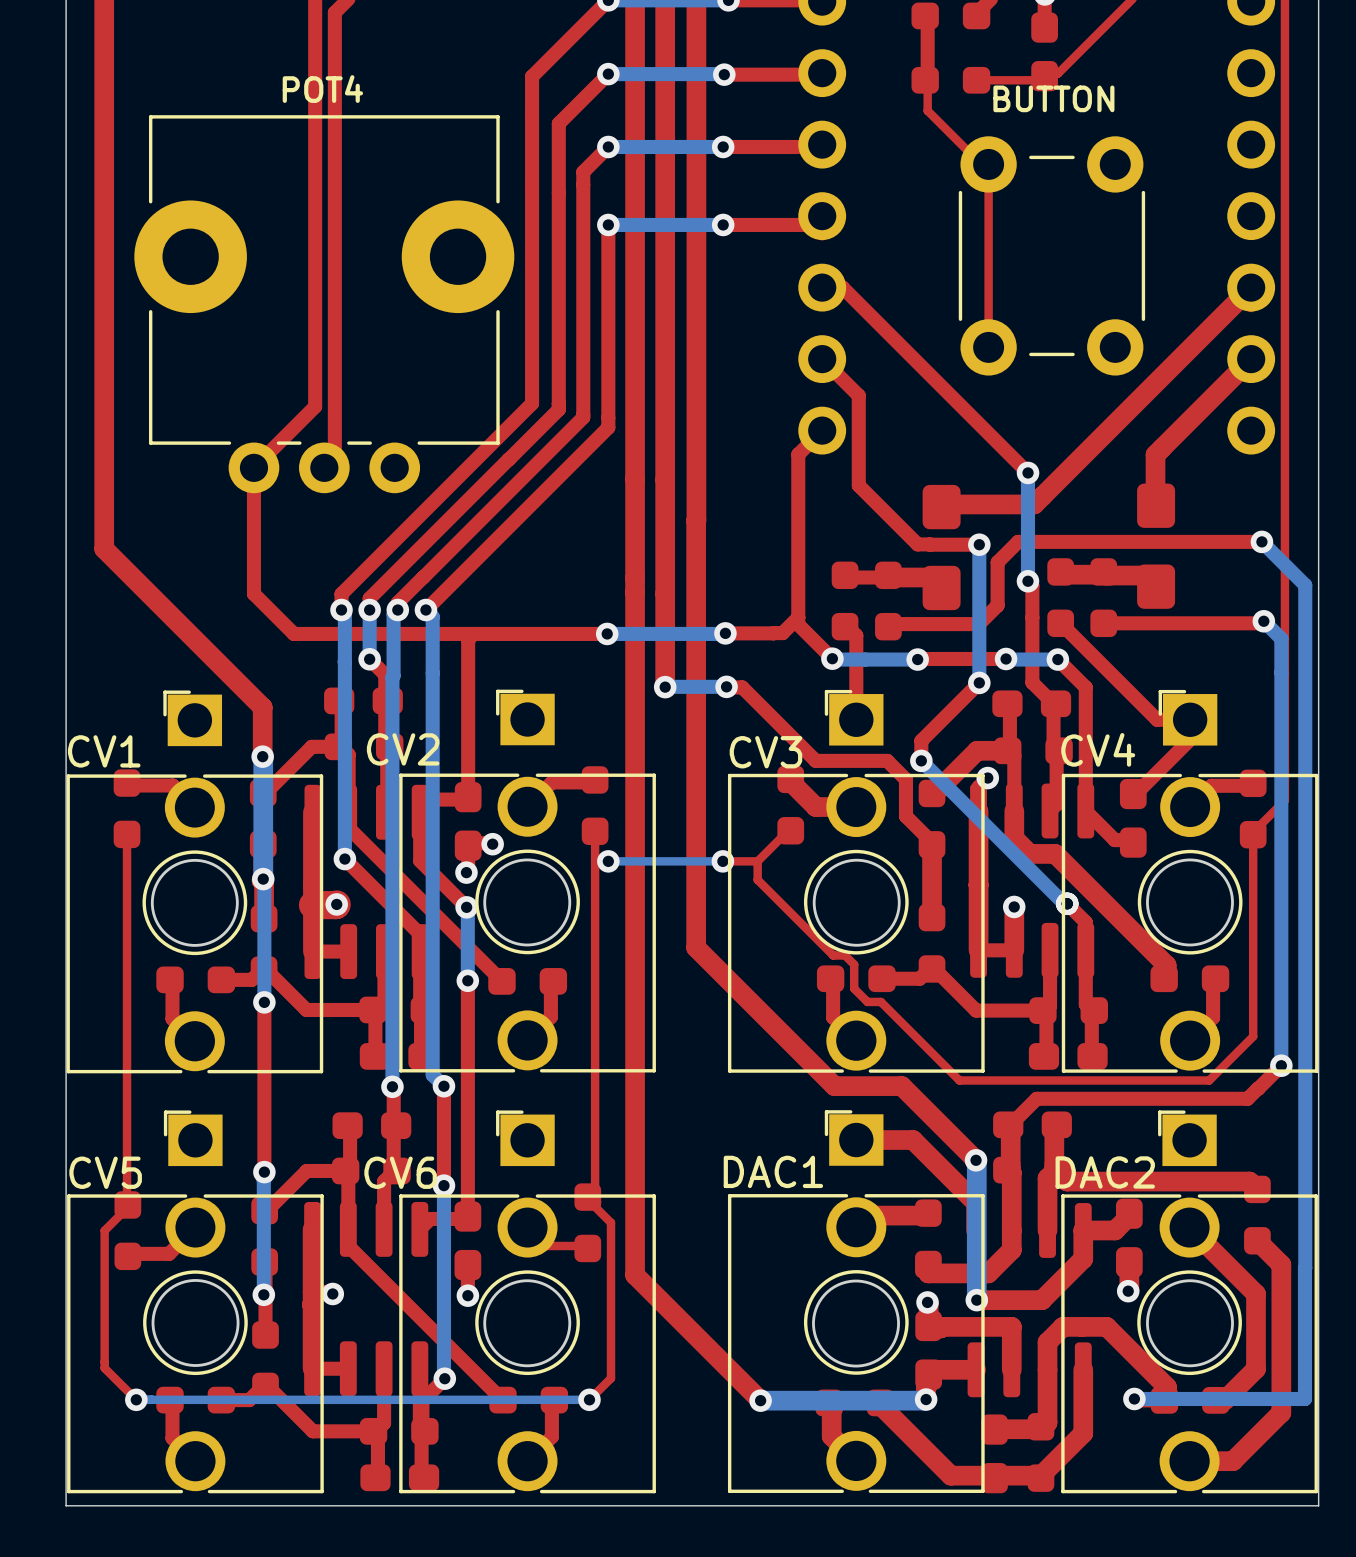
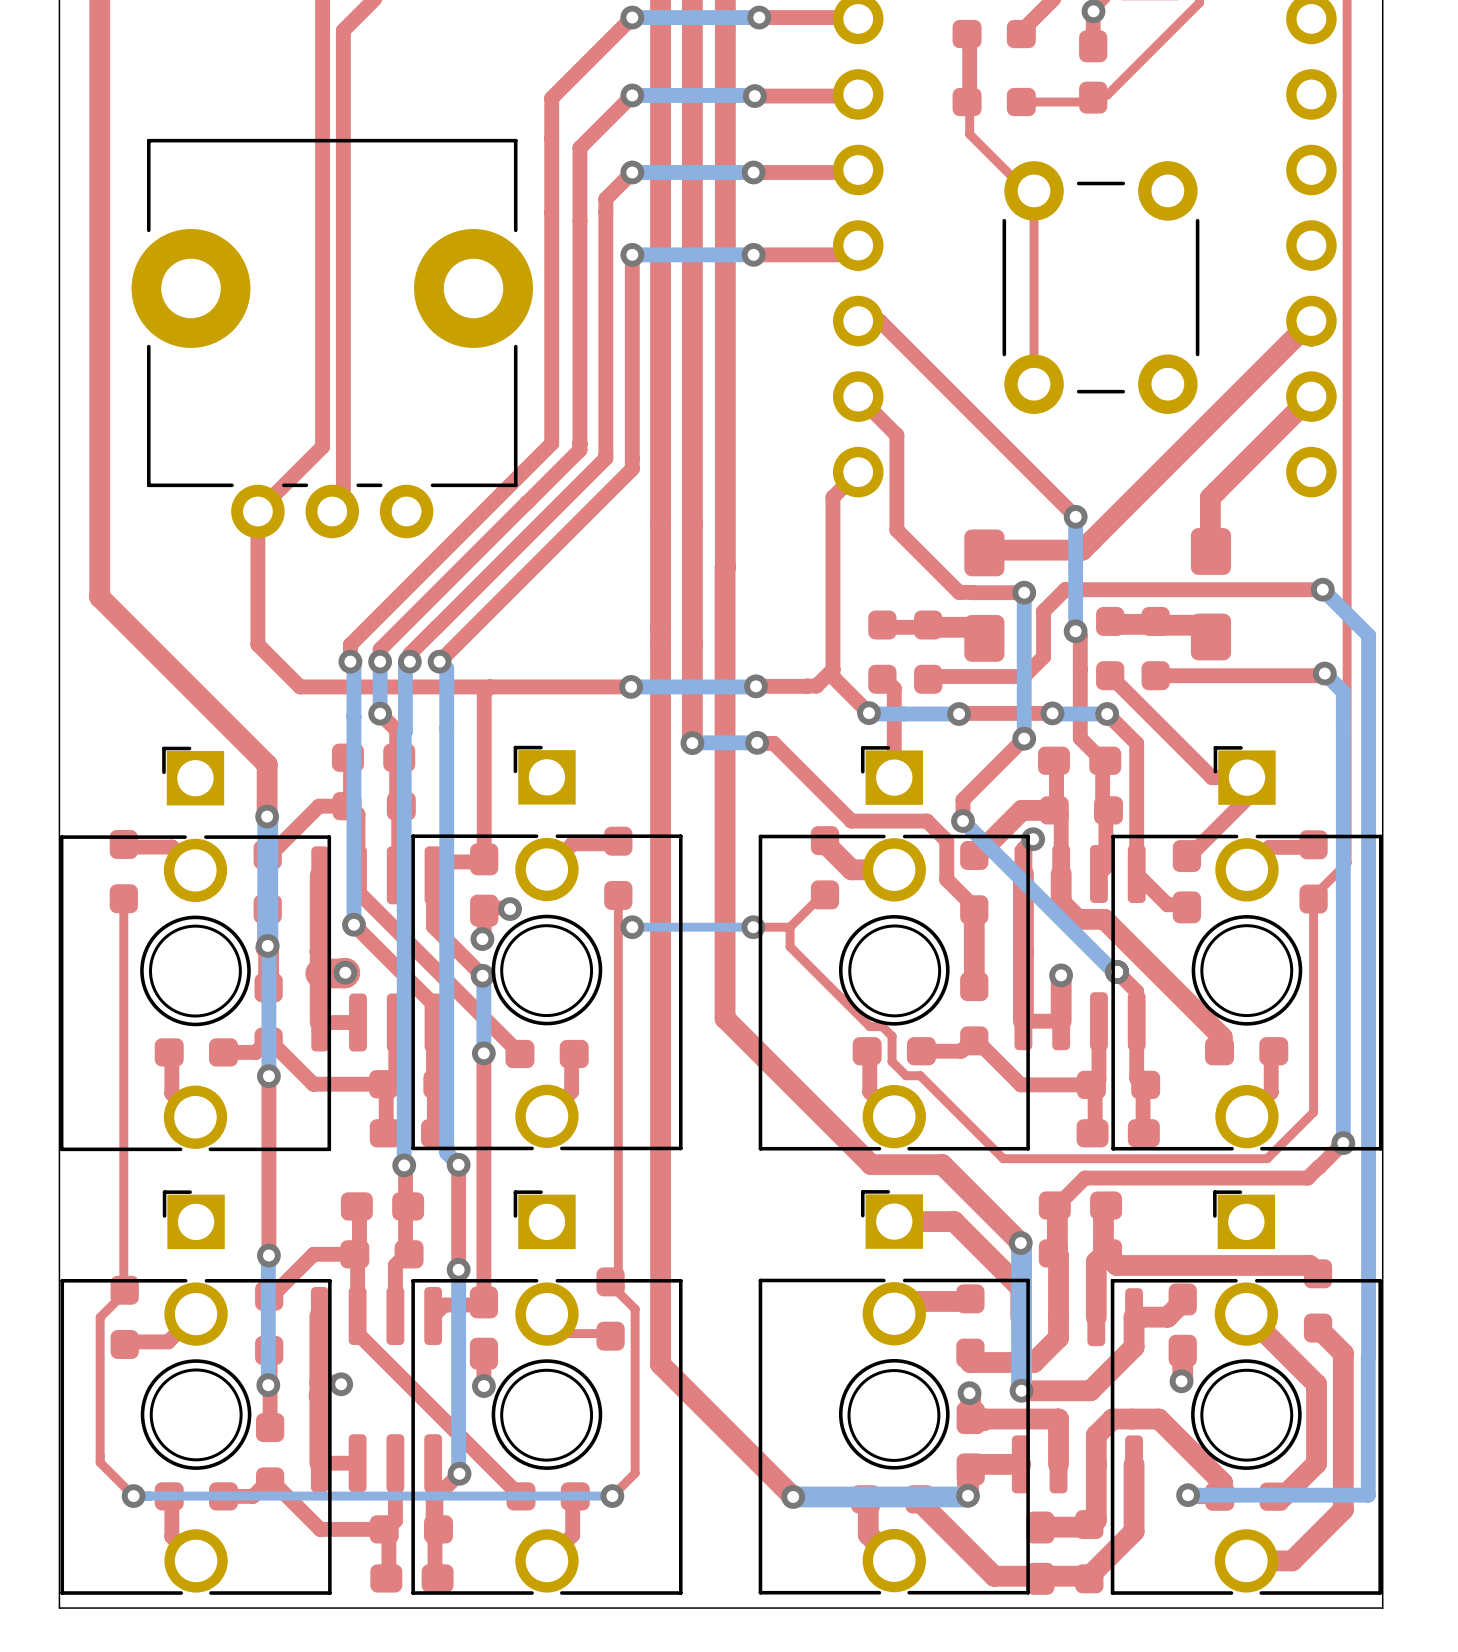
text: POT4 (322, 89) -> none
text: BUTTON (1053, 98) -> none
text: CV2 (403, 749) -> none
text: CV4 (1098, 749) -> none
text: CV1 (104, 751) -> none
text: CV3 (765, 752) -> none
text: DAC1 (773, 1171) -> none
text: CV5 (105, 1172) -> none
text: CV6 (400, 1172) -> none
text: DAC2 (1105, 1172) -> none

